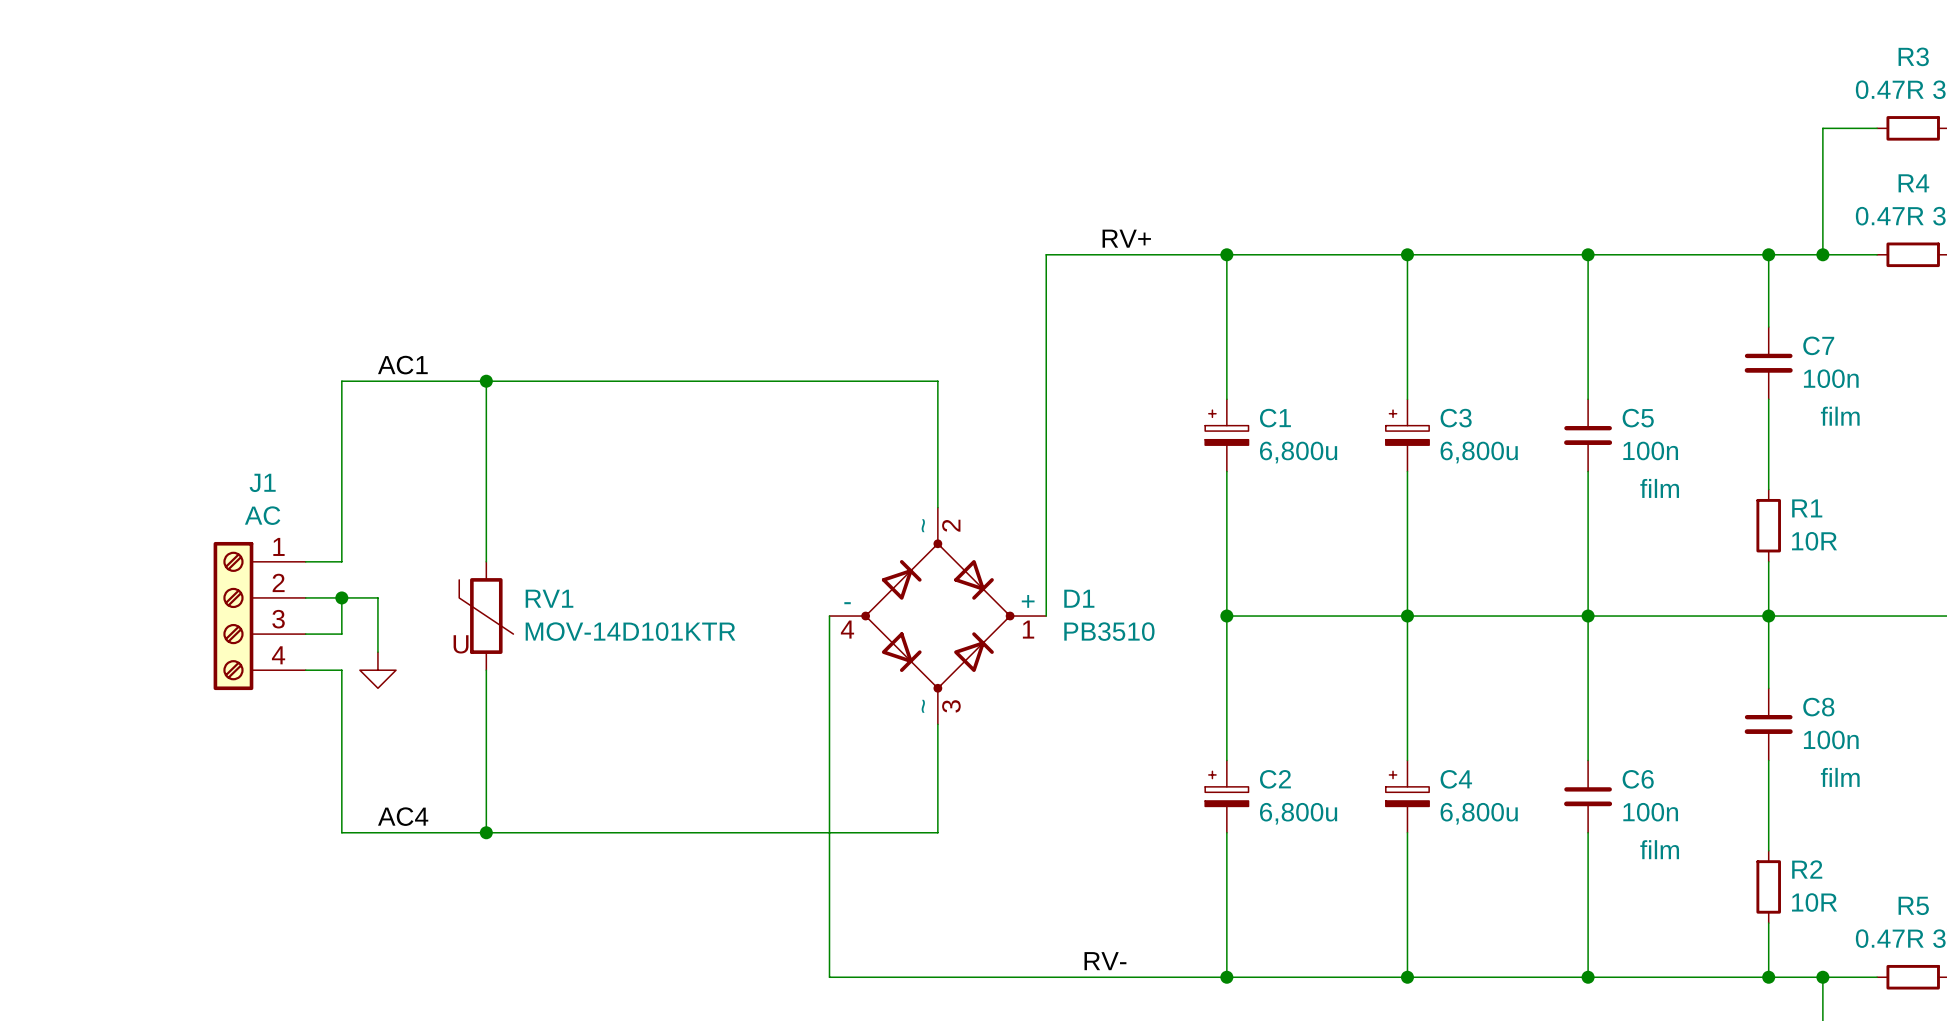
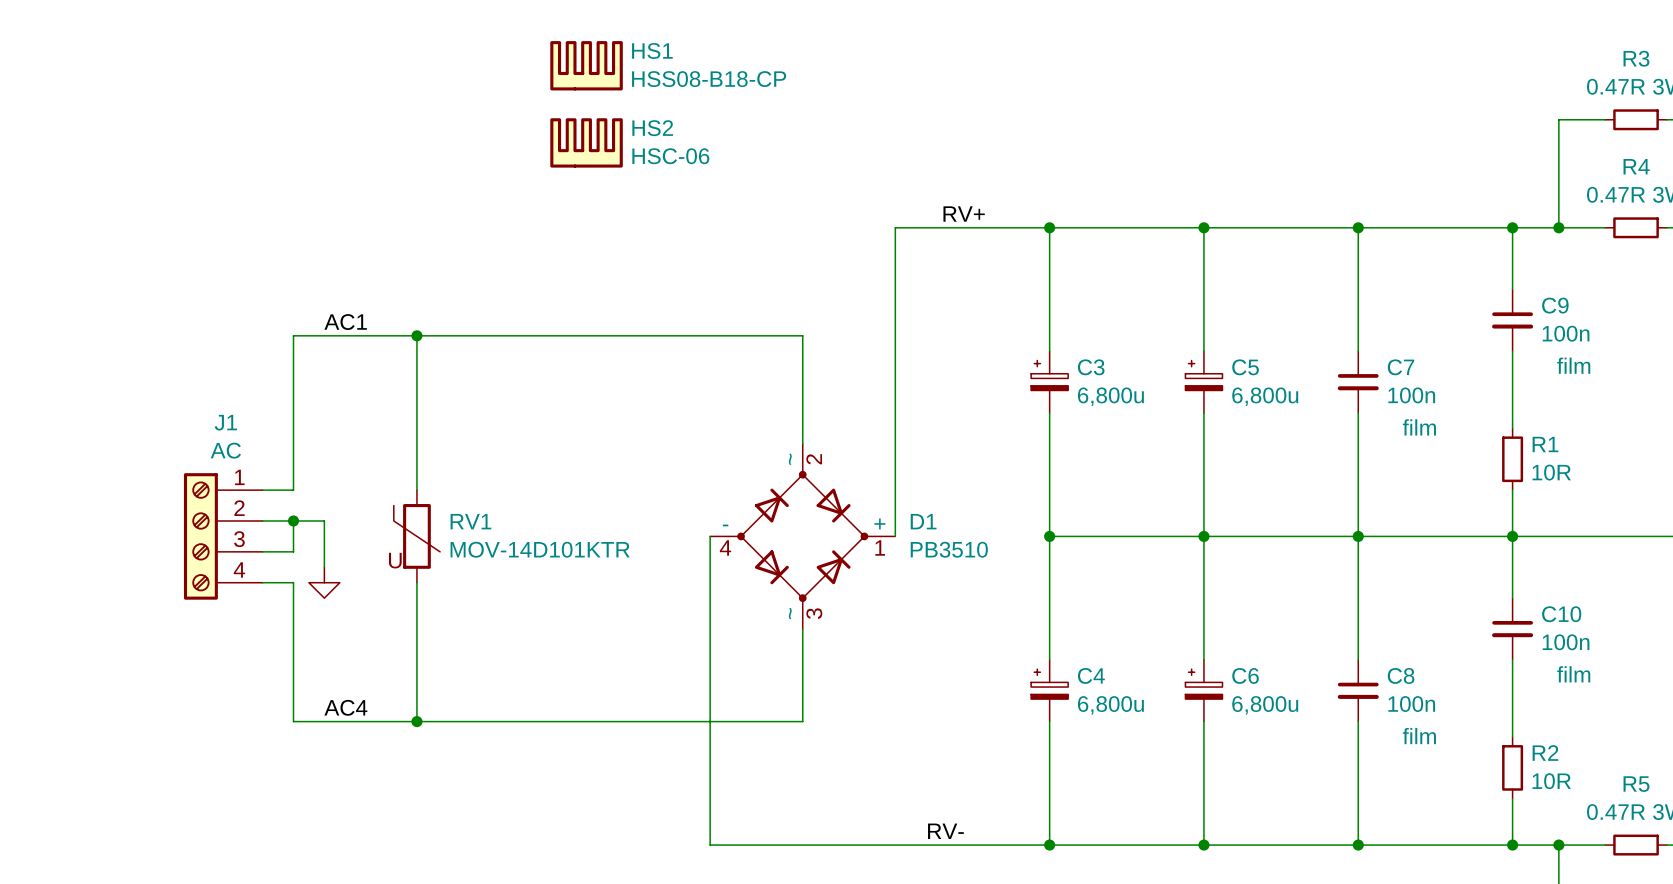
HS1: none -> HSS08-B18-CP (586, 65)
HS2: none -> HSC-06 (586, 142)
C7 name: C7 (1818, 345) -> C9 (1555, 305)
C1 name: C1 (1275, 418) -> C3 (1091, 367)
C3 name: C3 (1456, 418) -> C5 (1245, 367)
C5 name: C5 (1638, 418) -> C7 (1401, 367)
C8 name: C8 (1818, 707) -> C10 (1561, 614)
C2 name: C2 (1275, 779) -> C4 (1091, 675)
C4 name: C4 (1456, 779) -> C6 (1245, 675)
C6 name: C6 (1638, 779) -> C8 (1401, 675)

